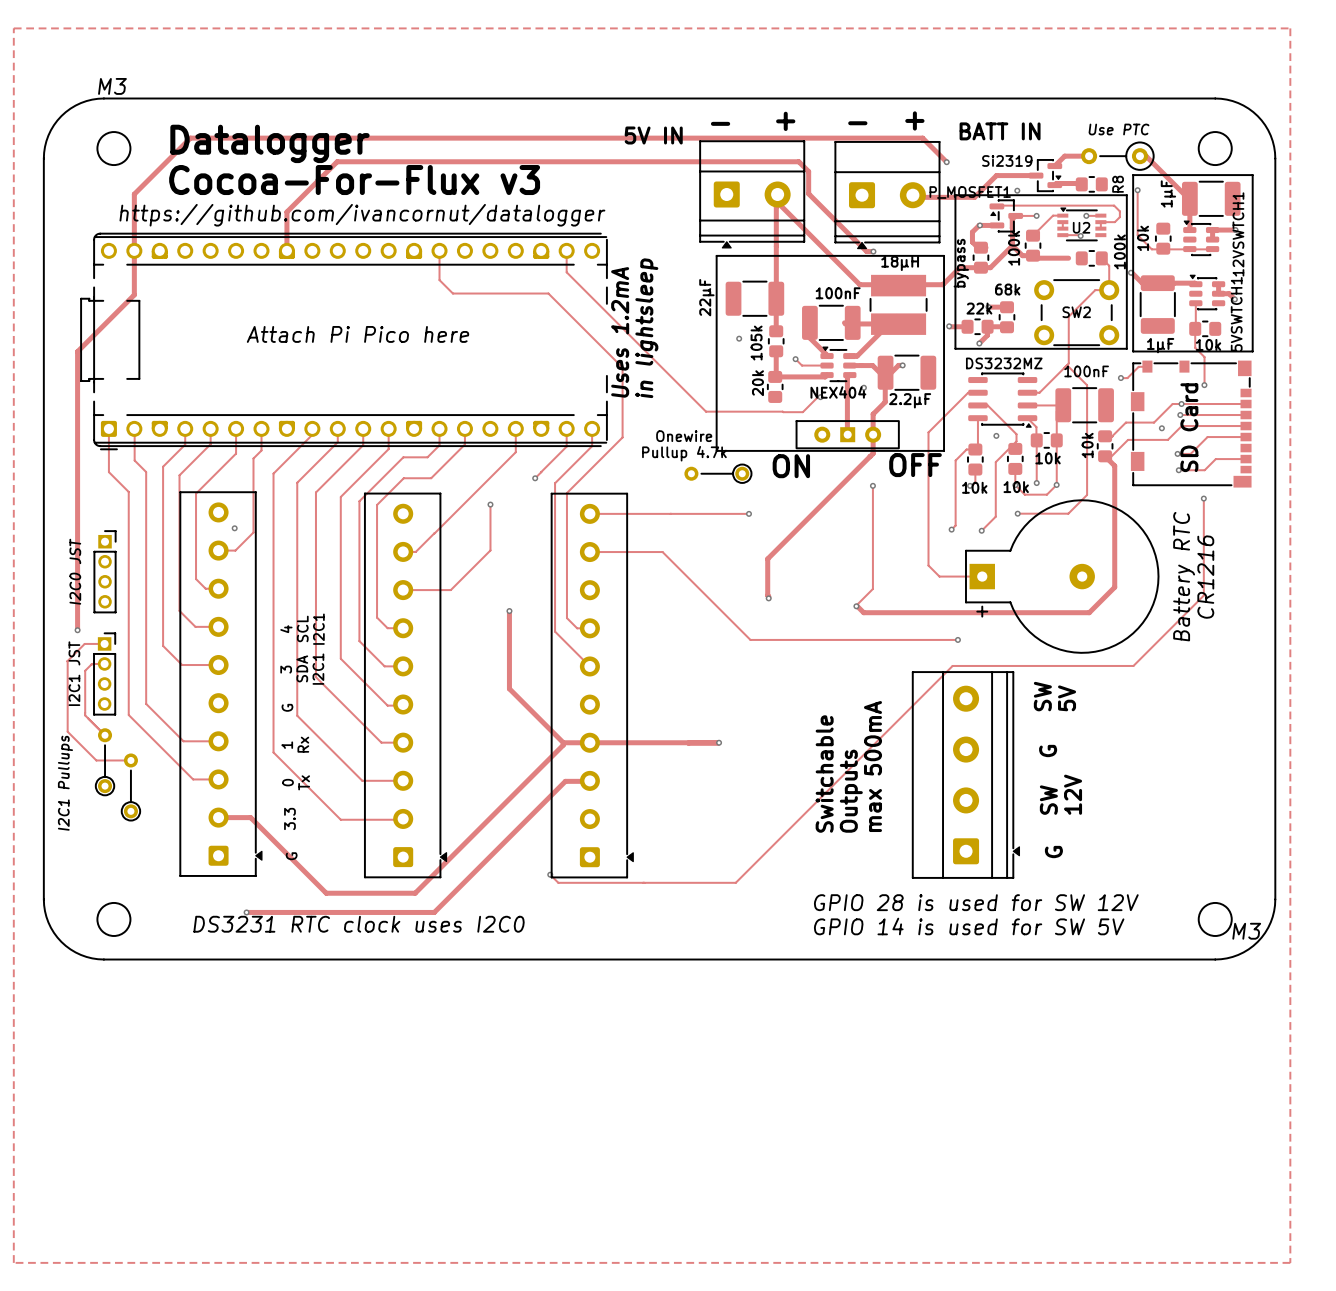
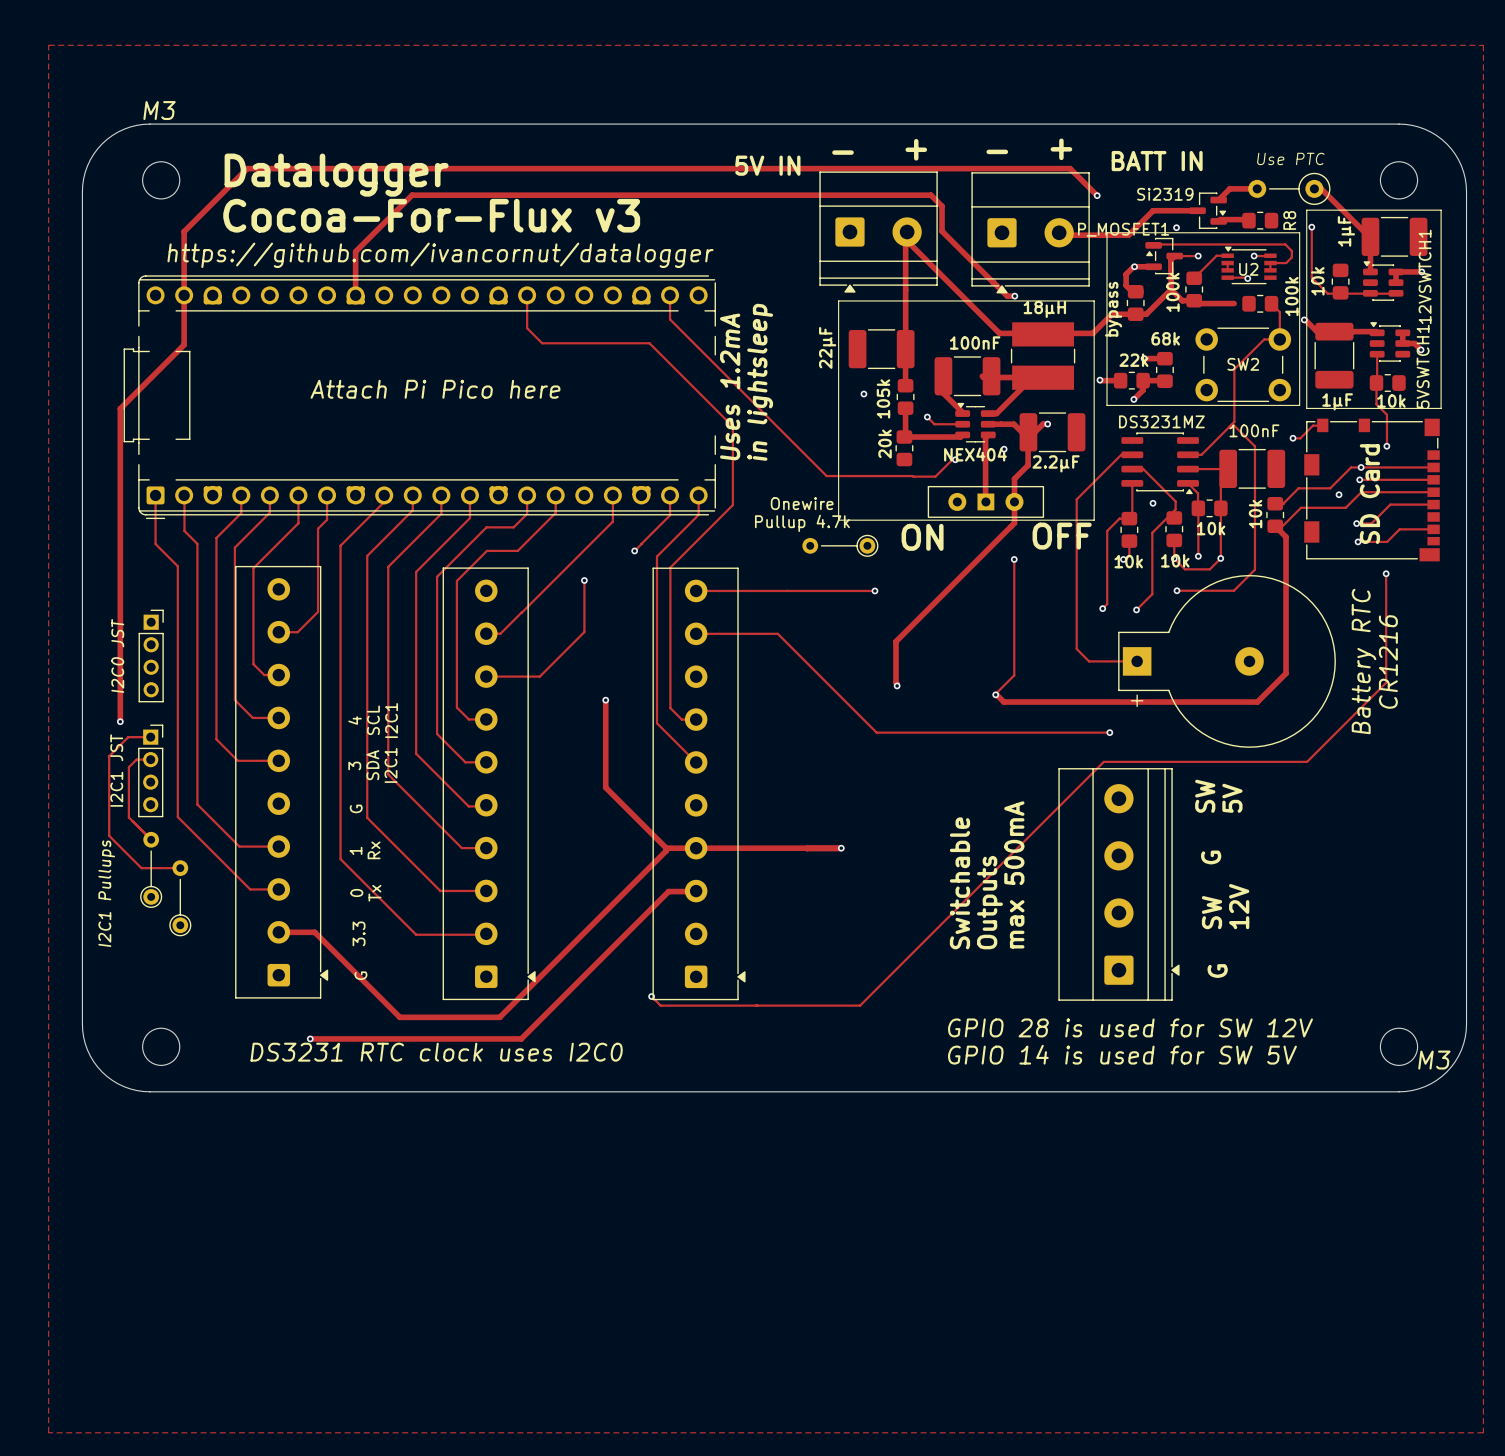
text: DS3232MZ (1004, 363) -> DS3231MZ (1161, 421)
via: (234, 528) -> none

